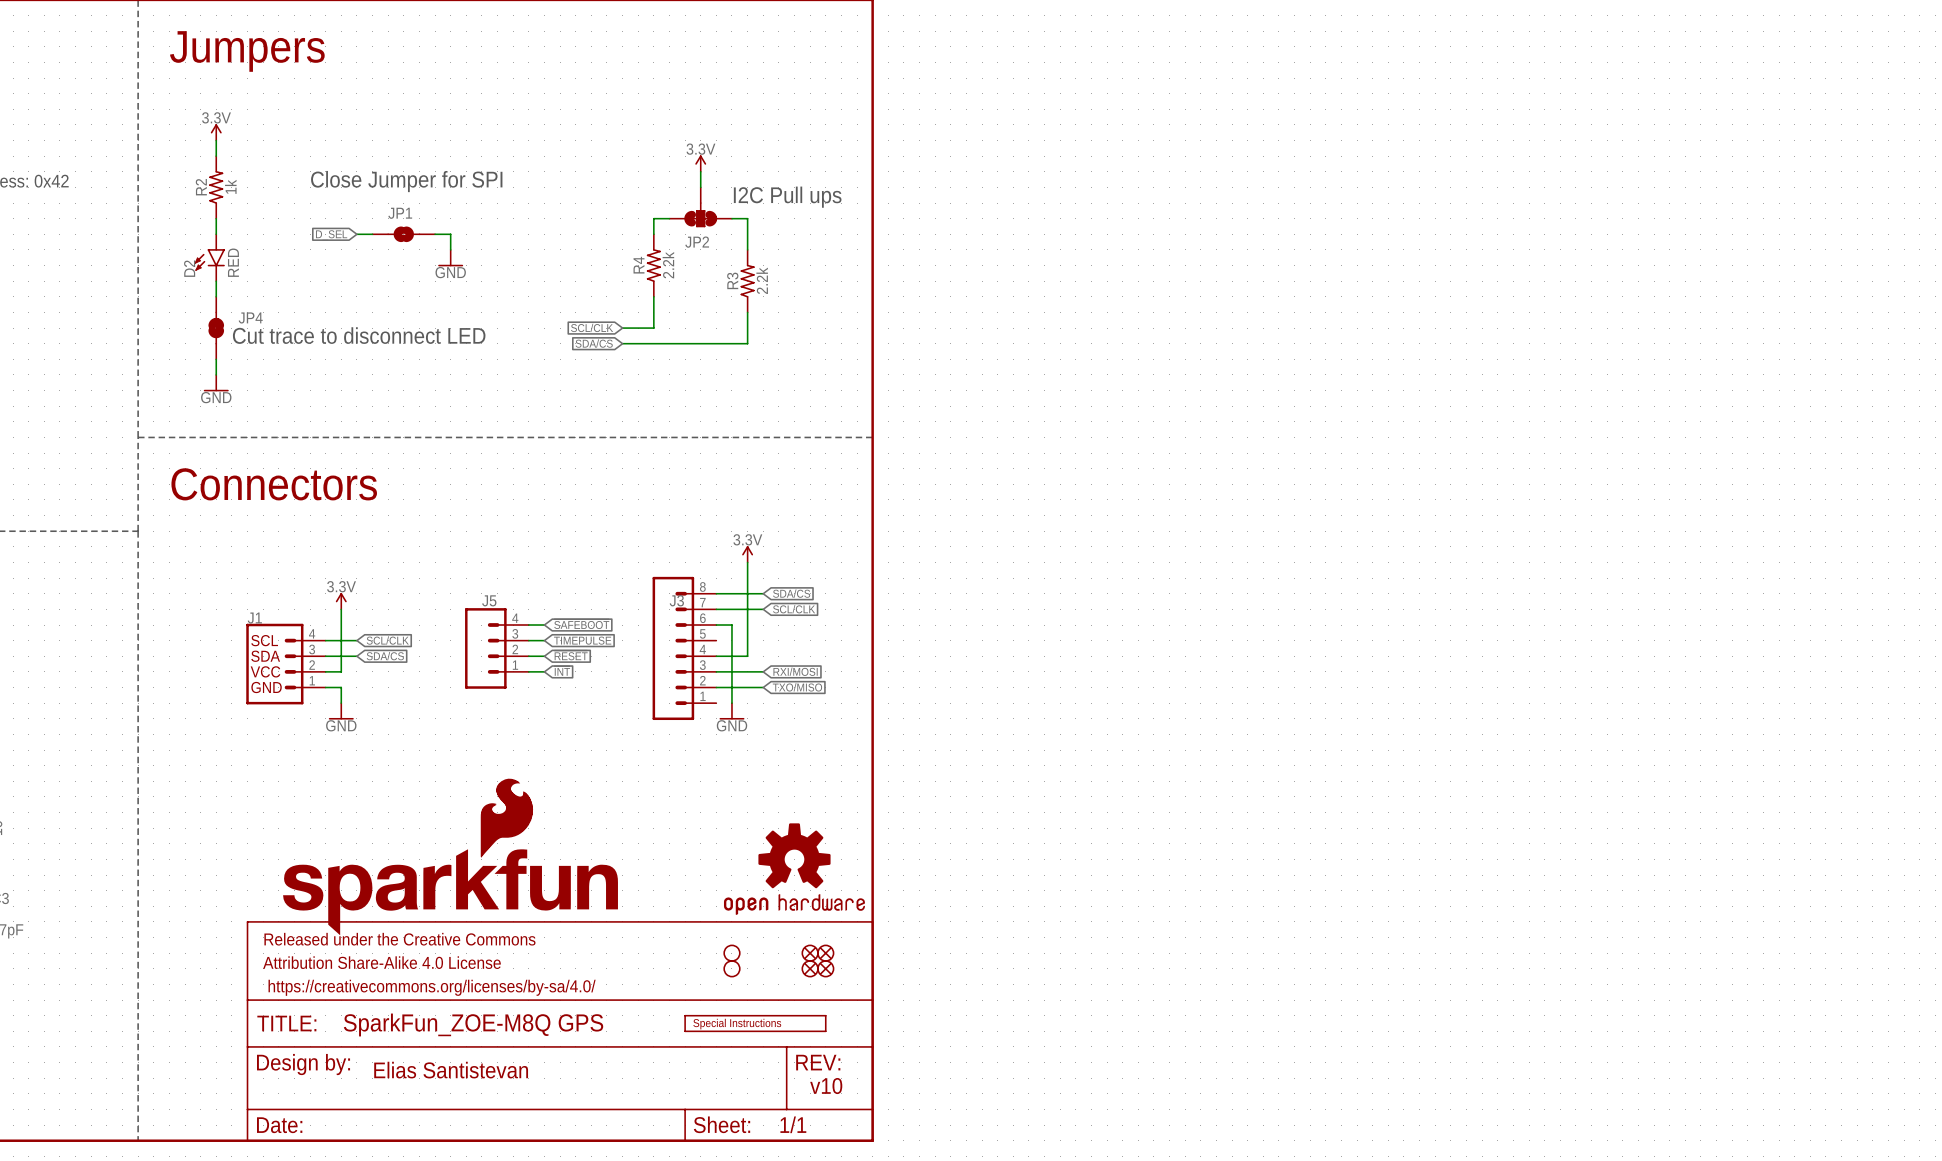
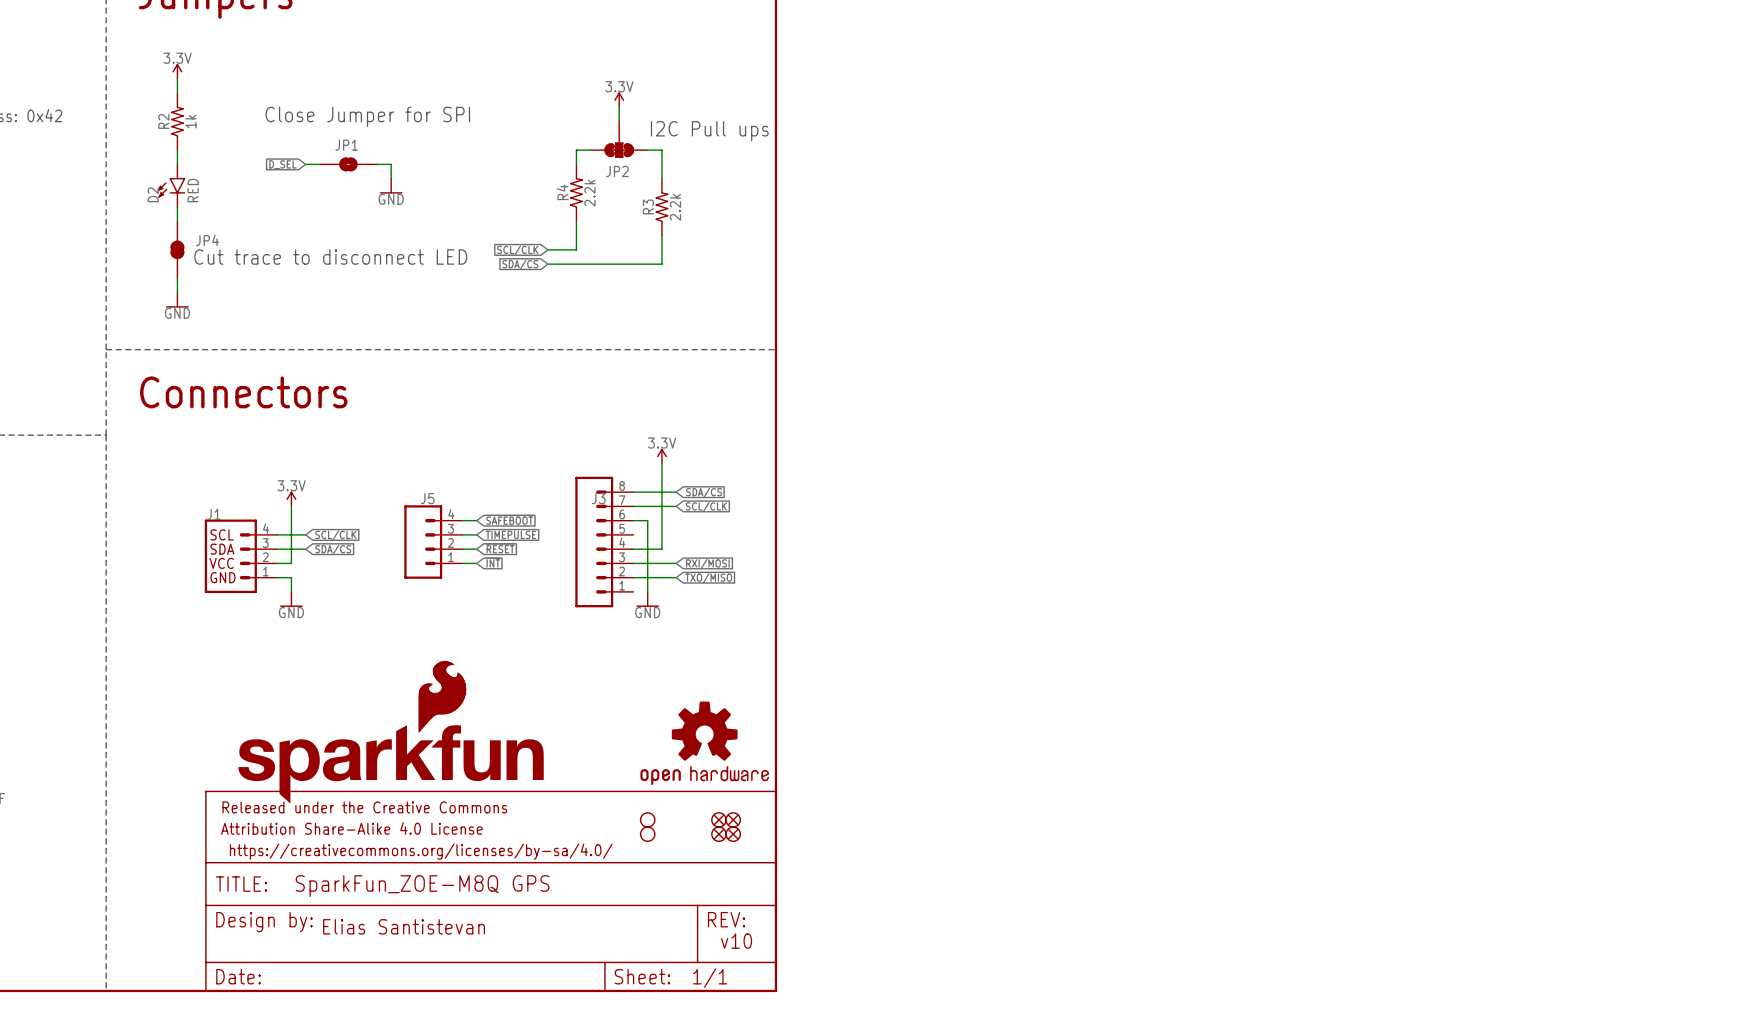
part: (755, 1023) -> none

